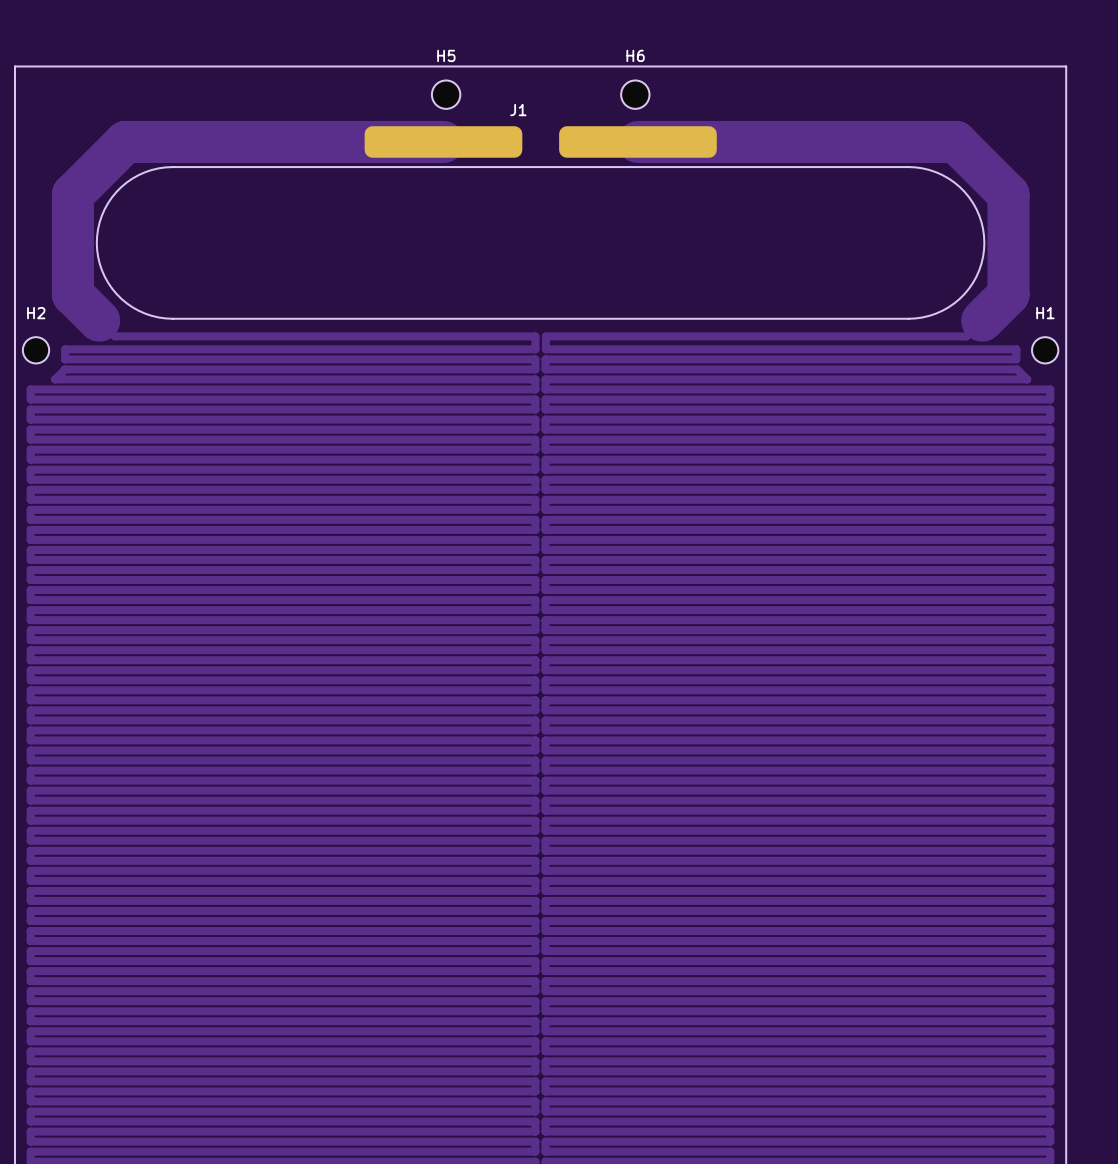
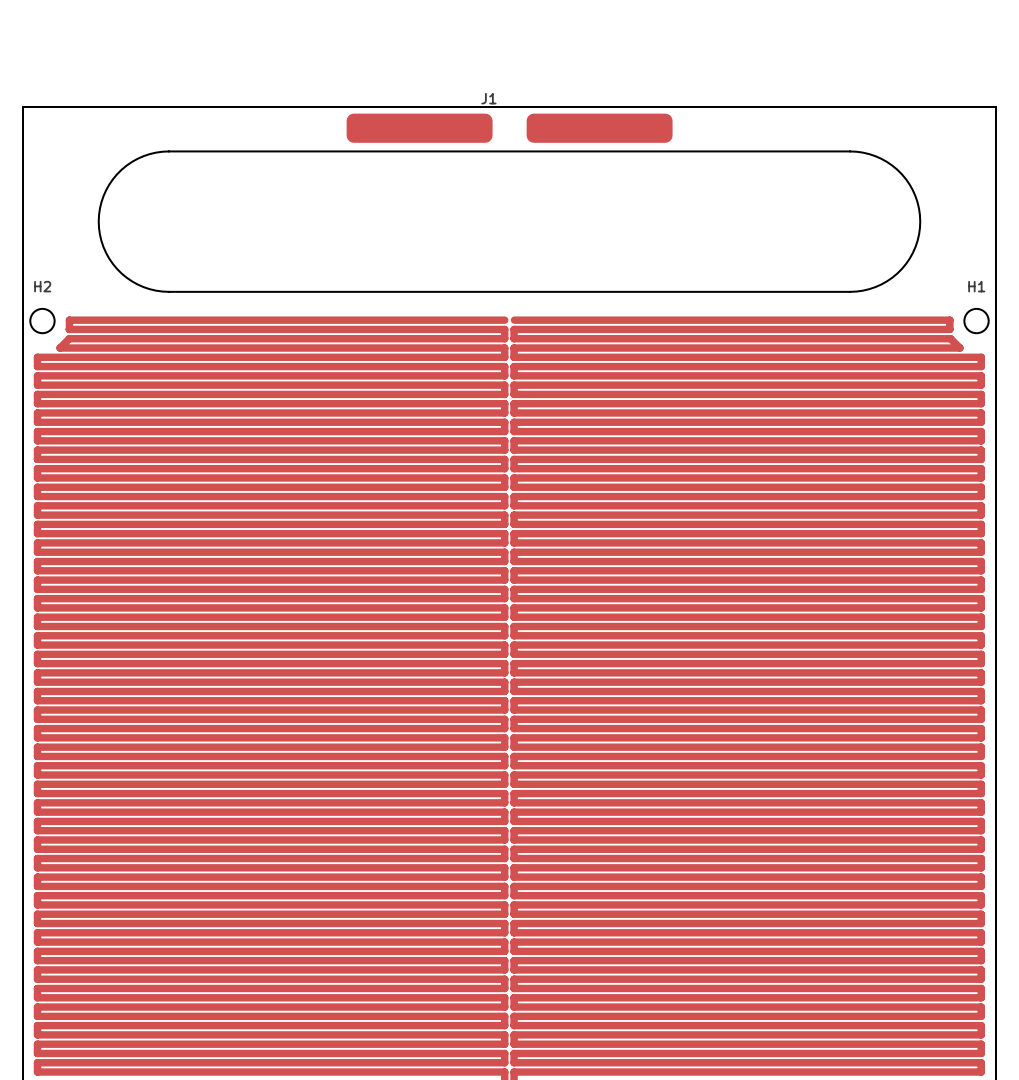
H5: (446, 94) -> none
H6: (635, 94) -> none
board edge: (15, 119) (15, 66) (1066, 66) (1066, 119) -> (23, 106) (995, 106)
track: (443, 141) (125, 141) (72, 194) (72, 294) (114, 336) (535, 336) (535, 349) -> none
track: (637, 141) (955, 141) (1008, 194) (1008, 294) (966, 336) (545, 336) (545, 349) -> none

